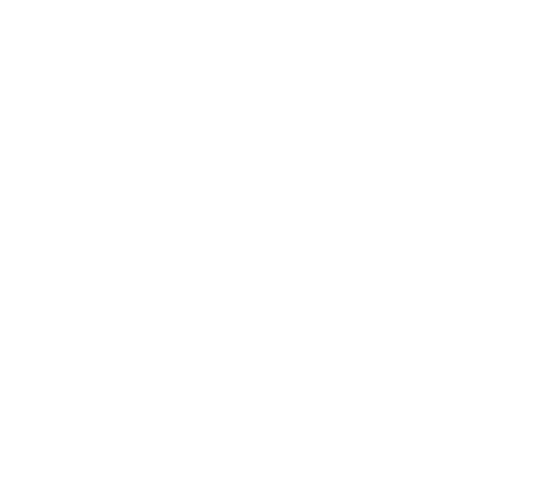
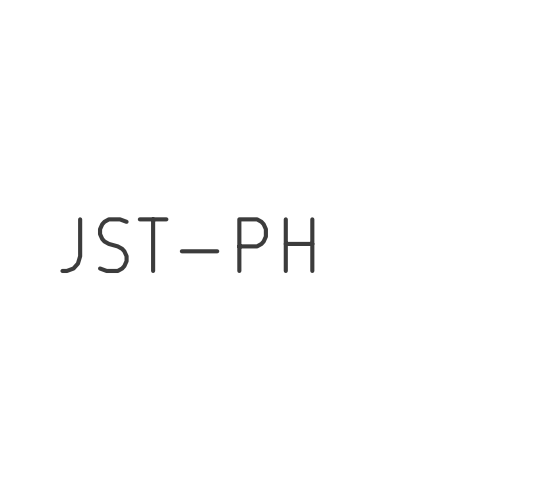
text: none -> JST-PH (187, 245)

